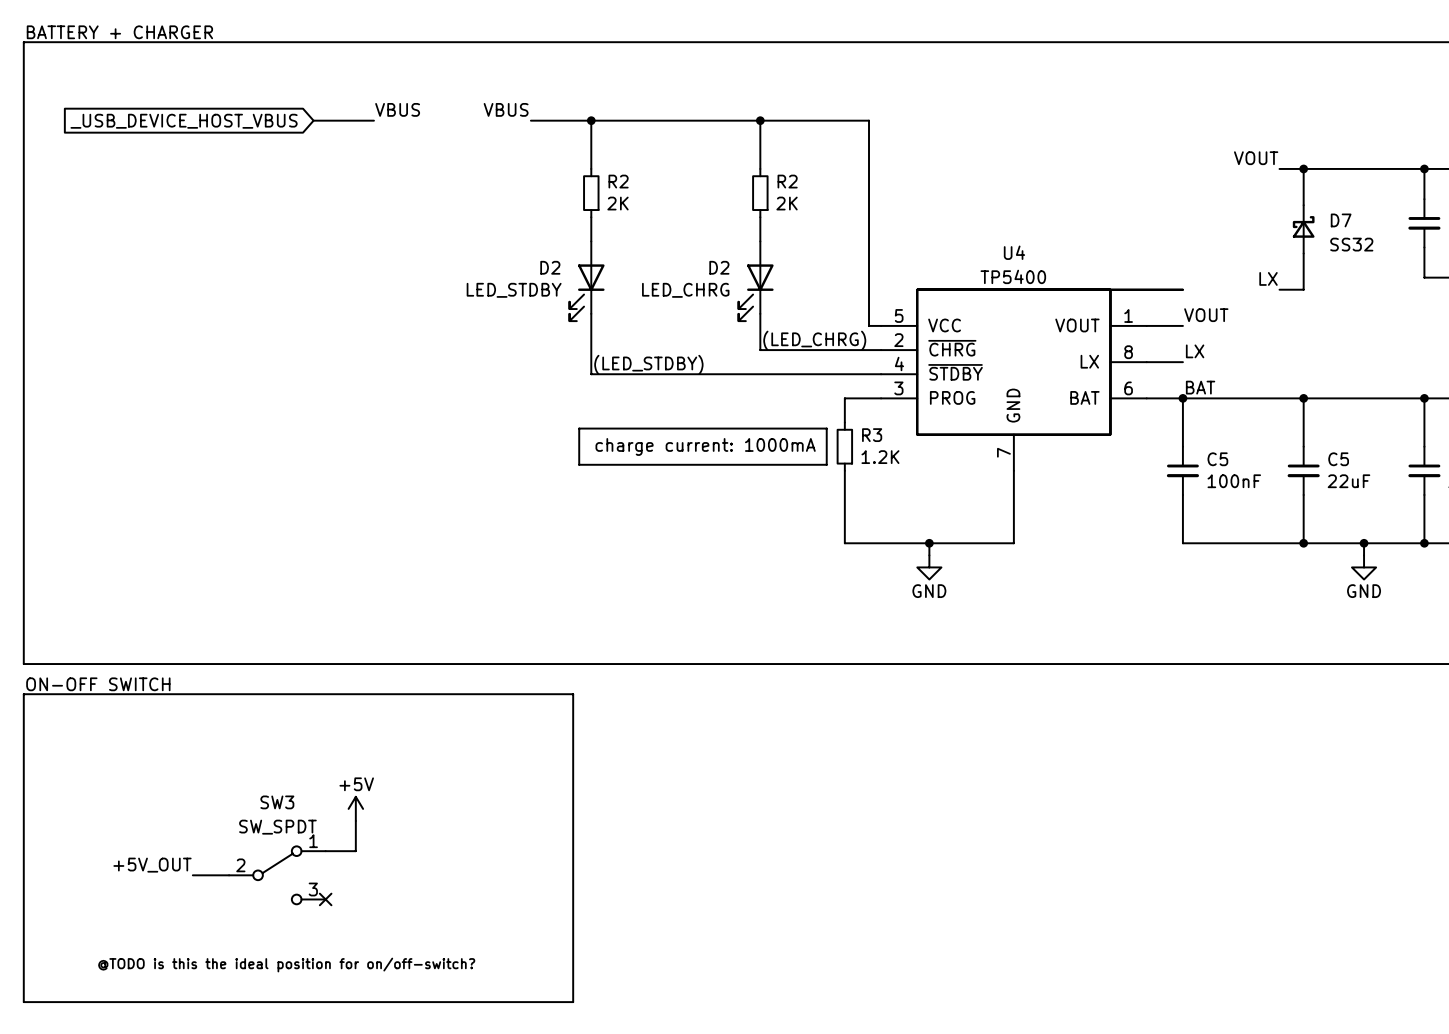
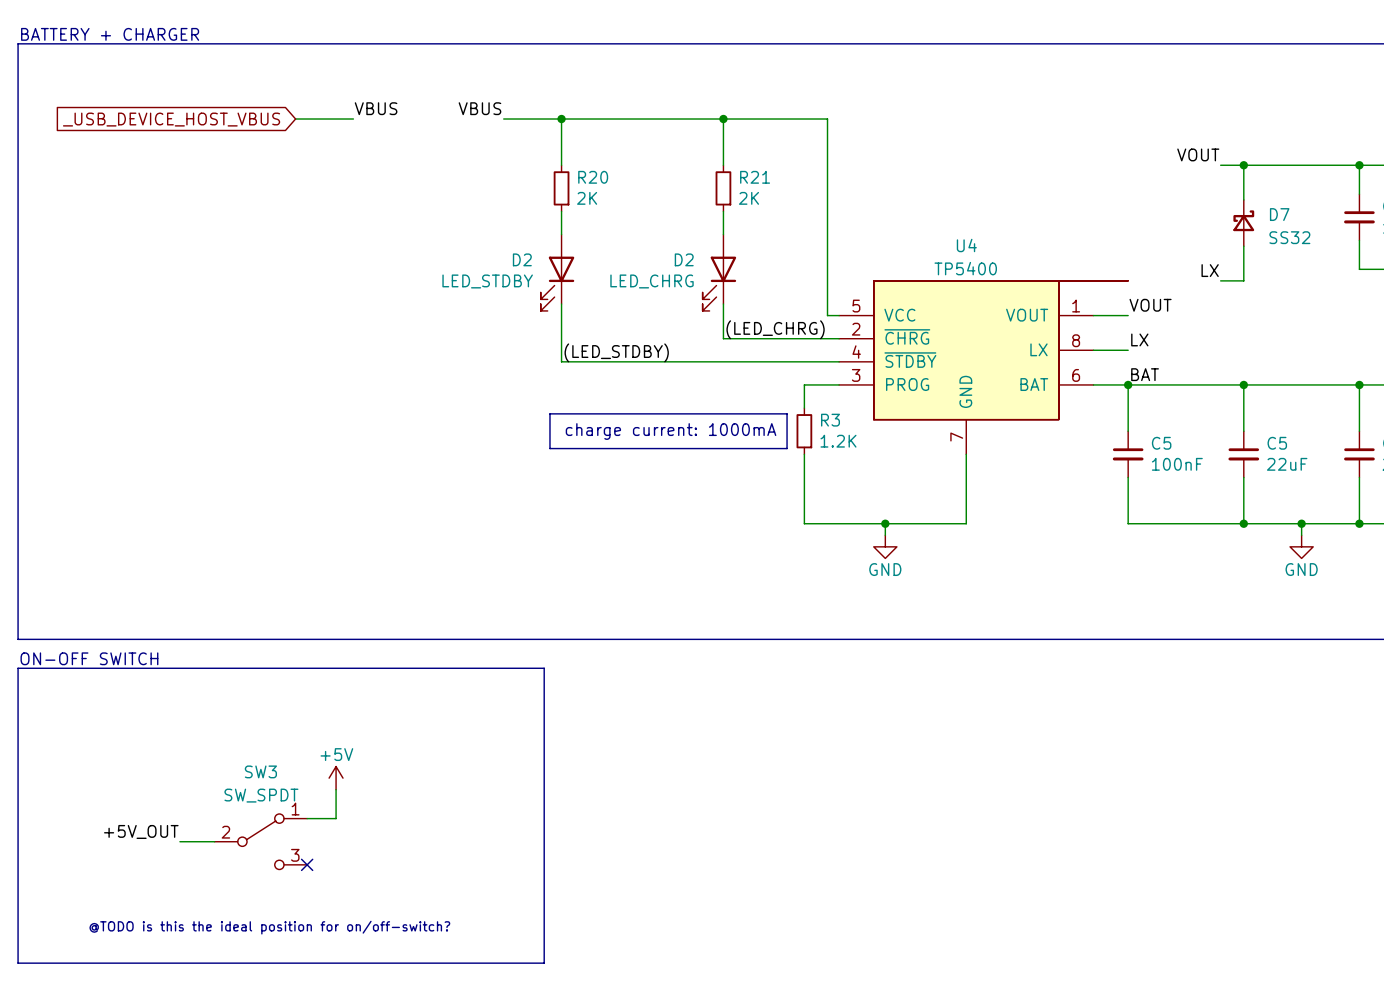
R2 name: R2 (618, 181) -> R20 (593, 177)
R2 name: R2 (787, 181) -> R21 (755, 177)

